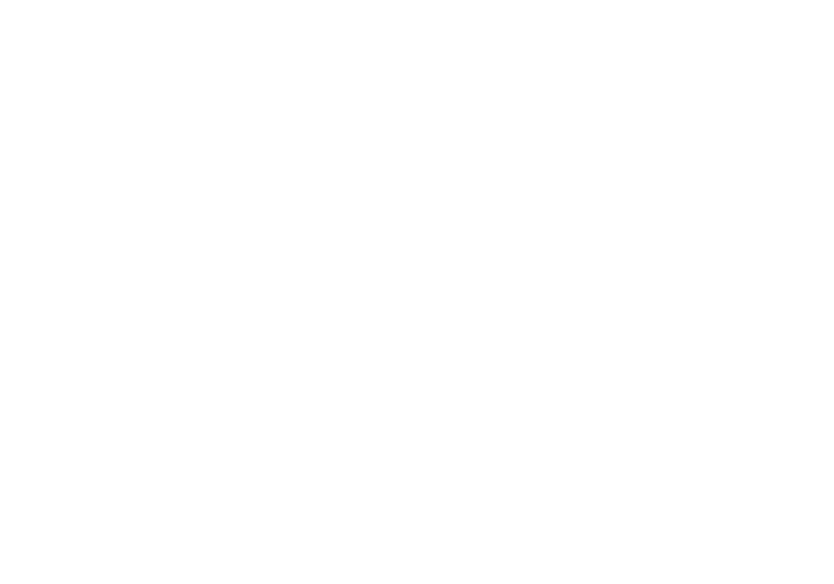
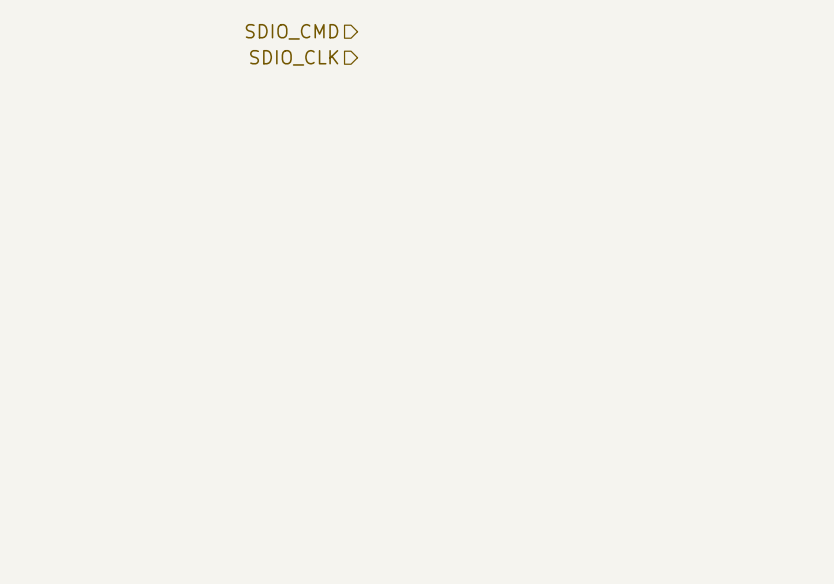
hierarchical label: none -> SDIO_CMD (292, 31)
hierarchical label: none -> SDIO_CLK (294, 57)

